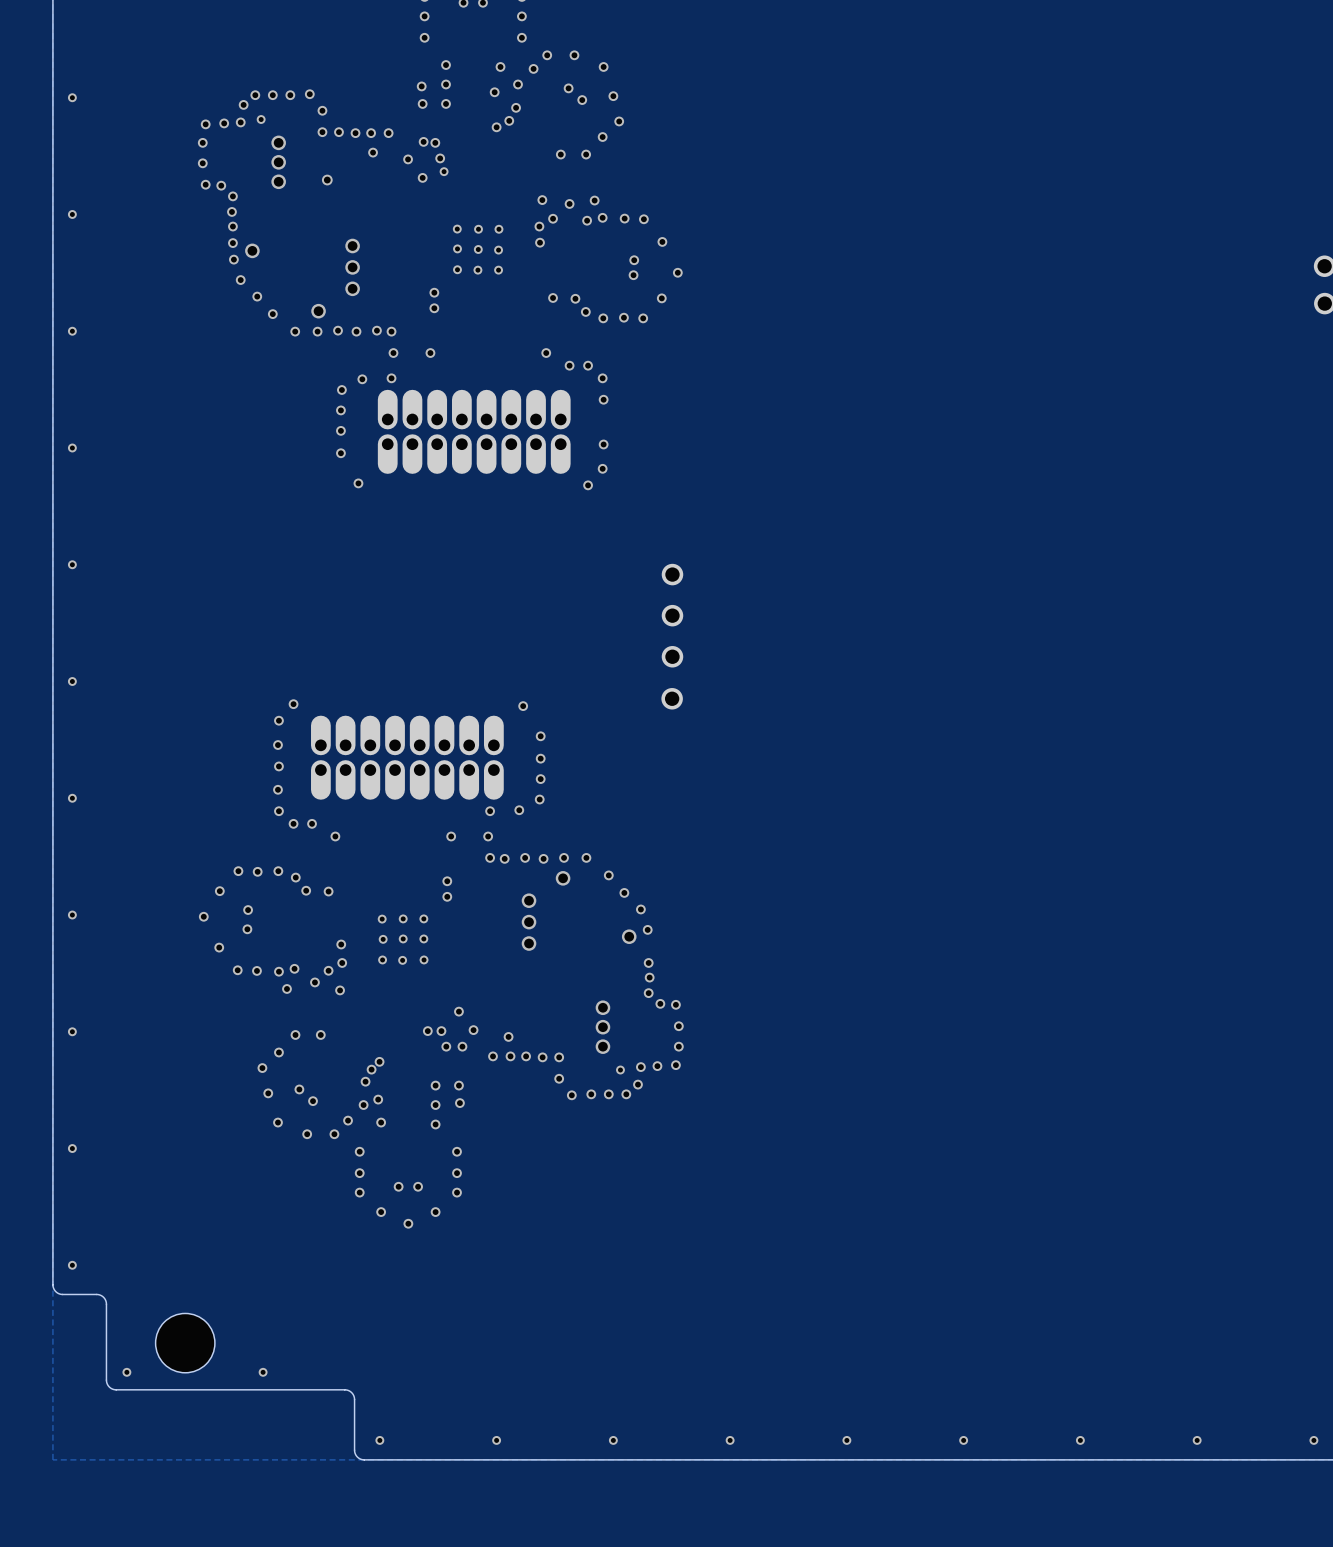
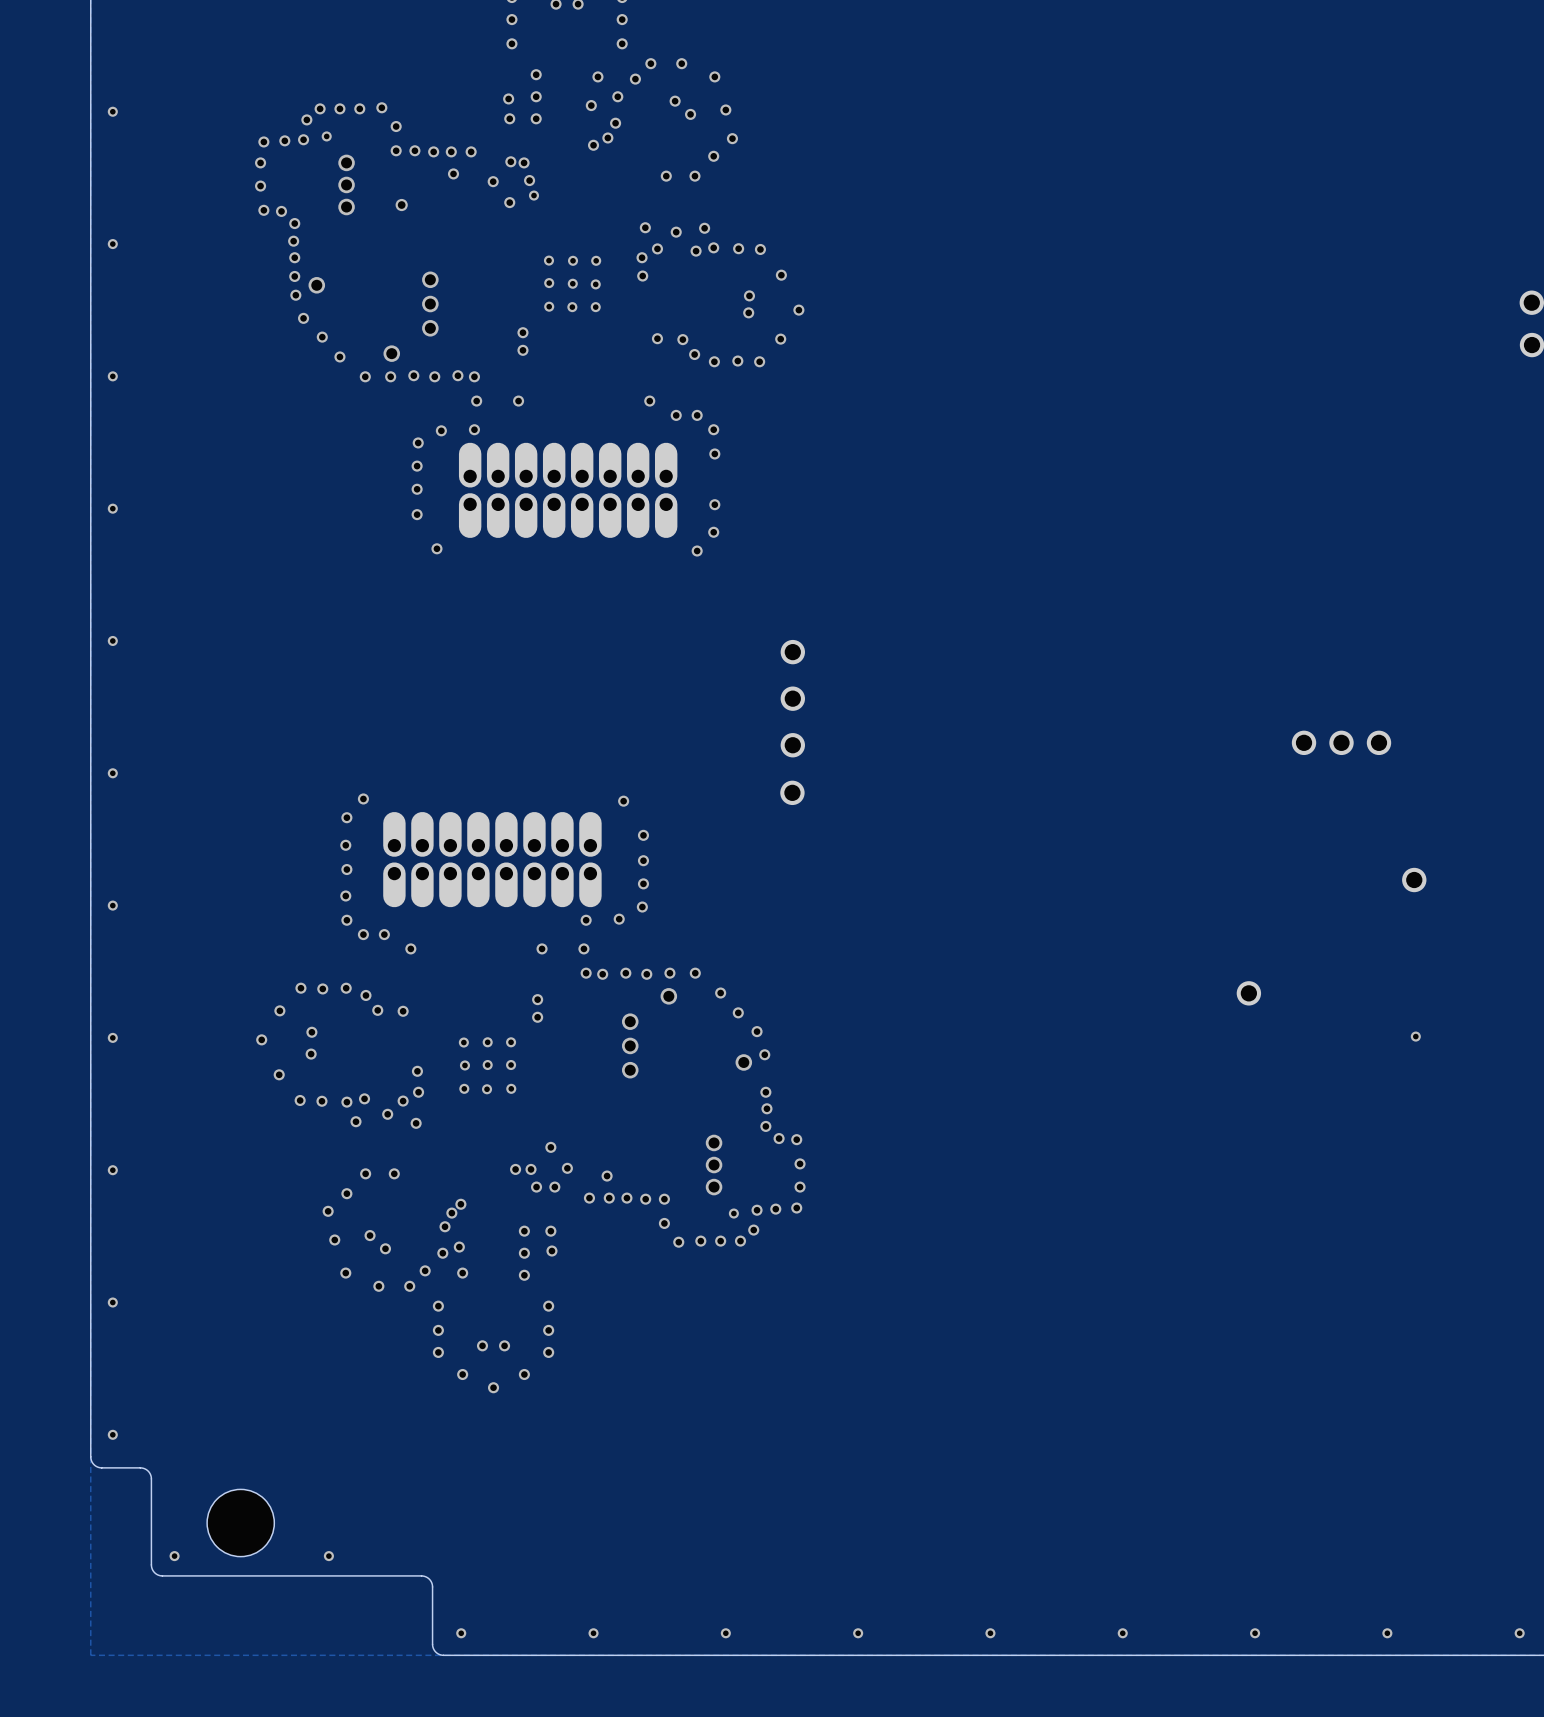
part: none -> (1304, 742)
part: none -> (1341, 742)
part: none -> (1378, 742)
part: none -> (1414, 880)
part: none -> (1248, 993)
via: none -> (1415, 1036)

